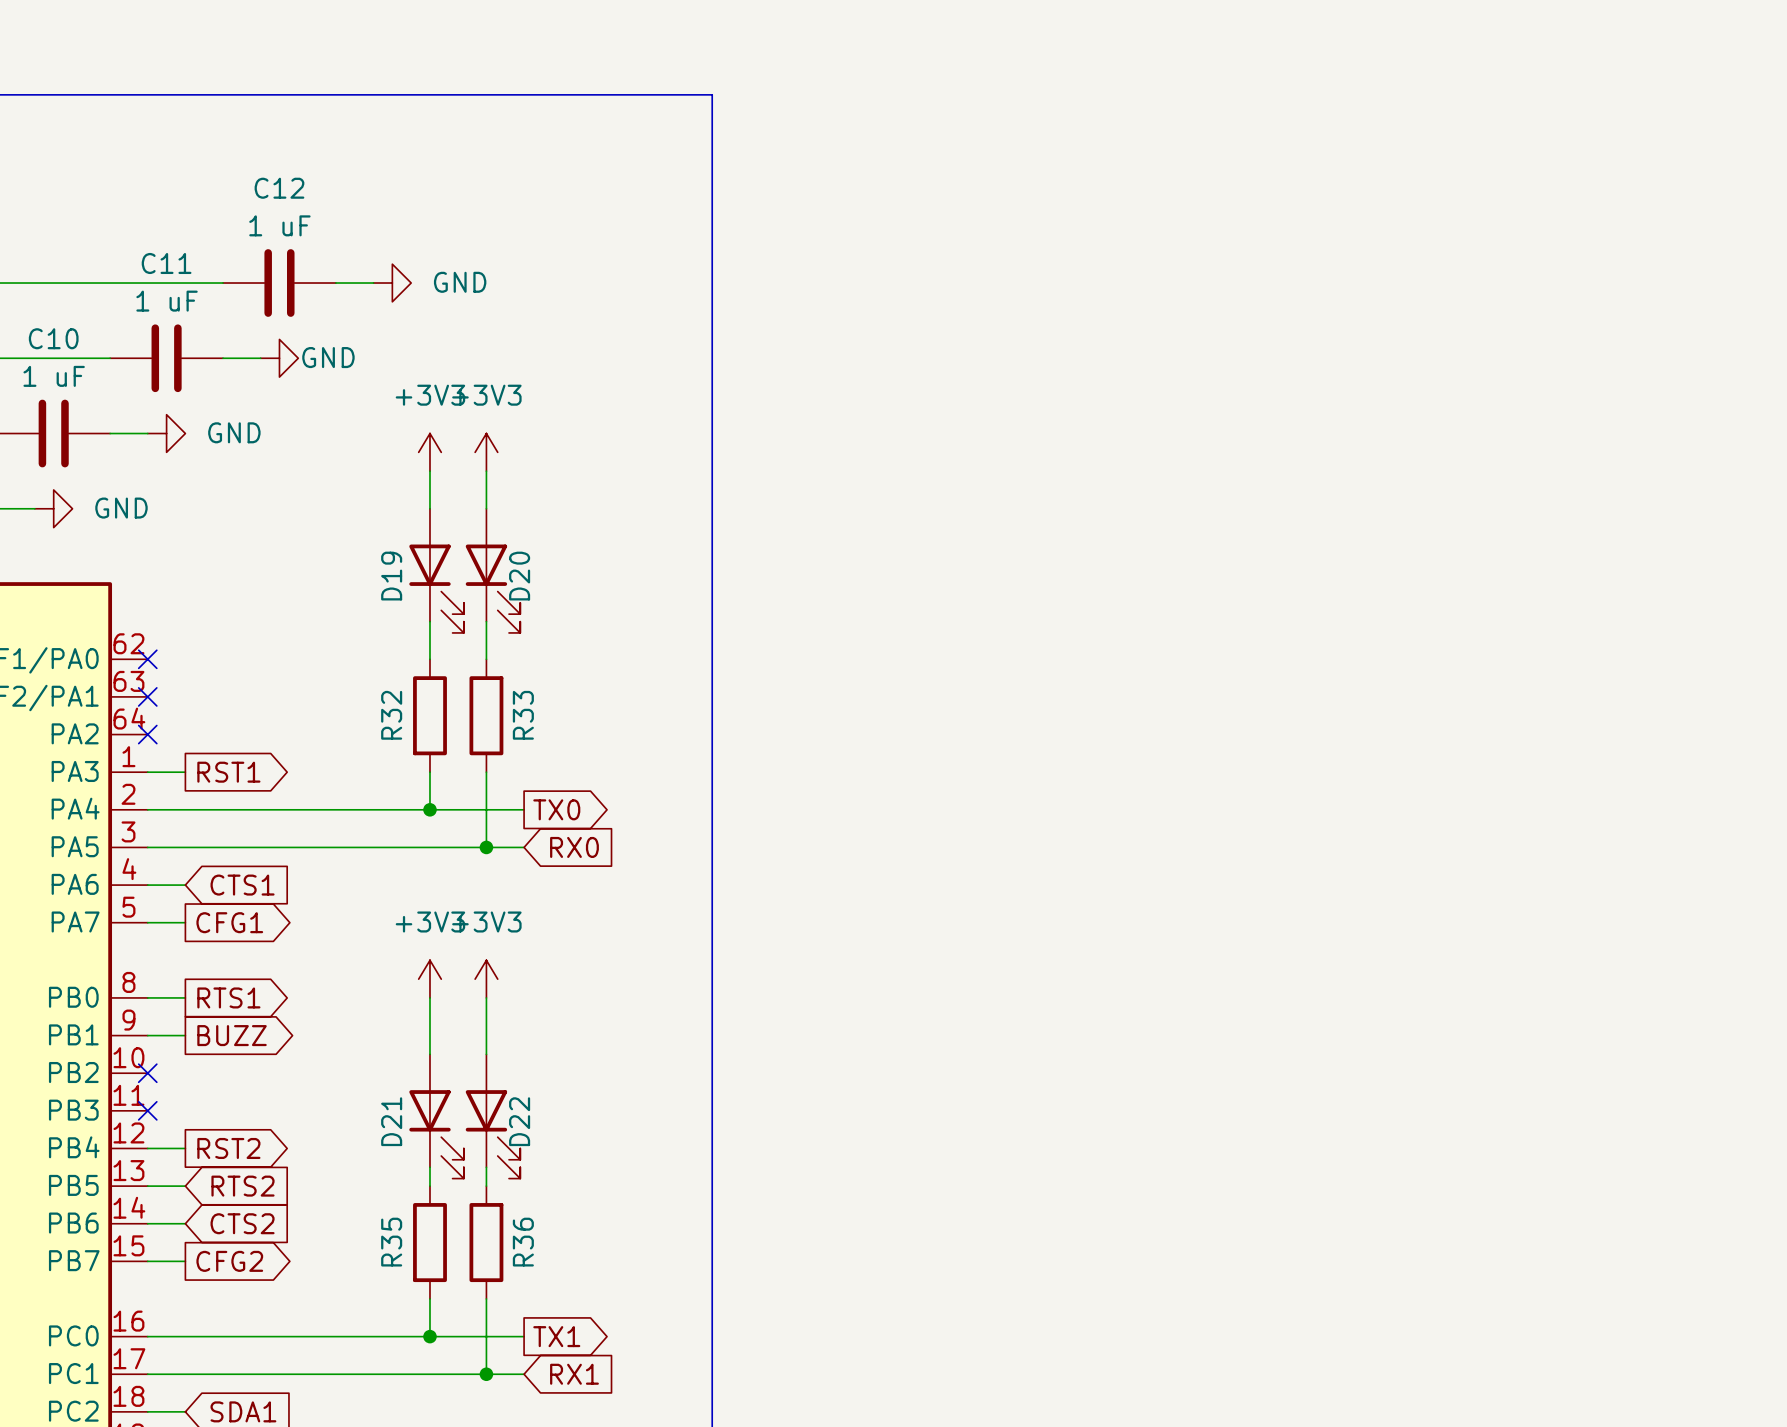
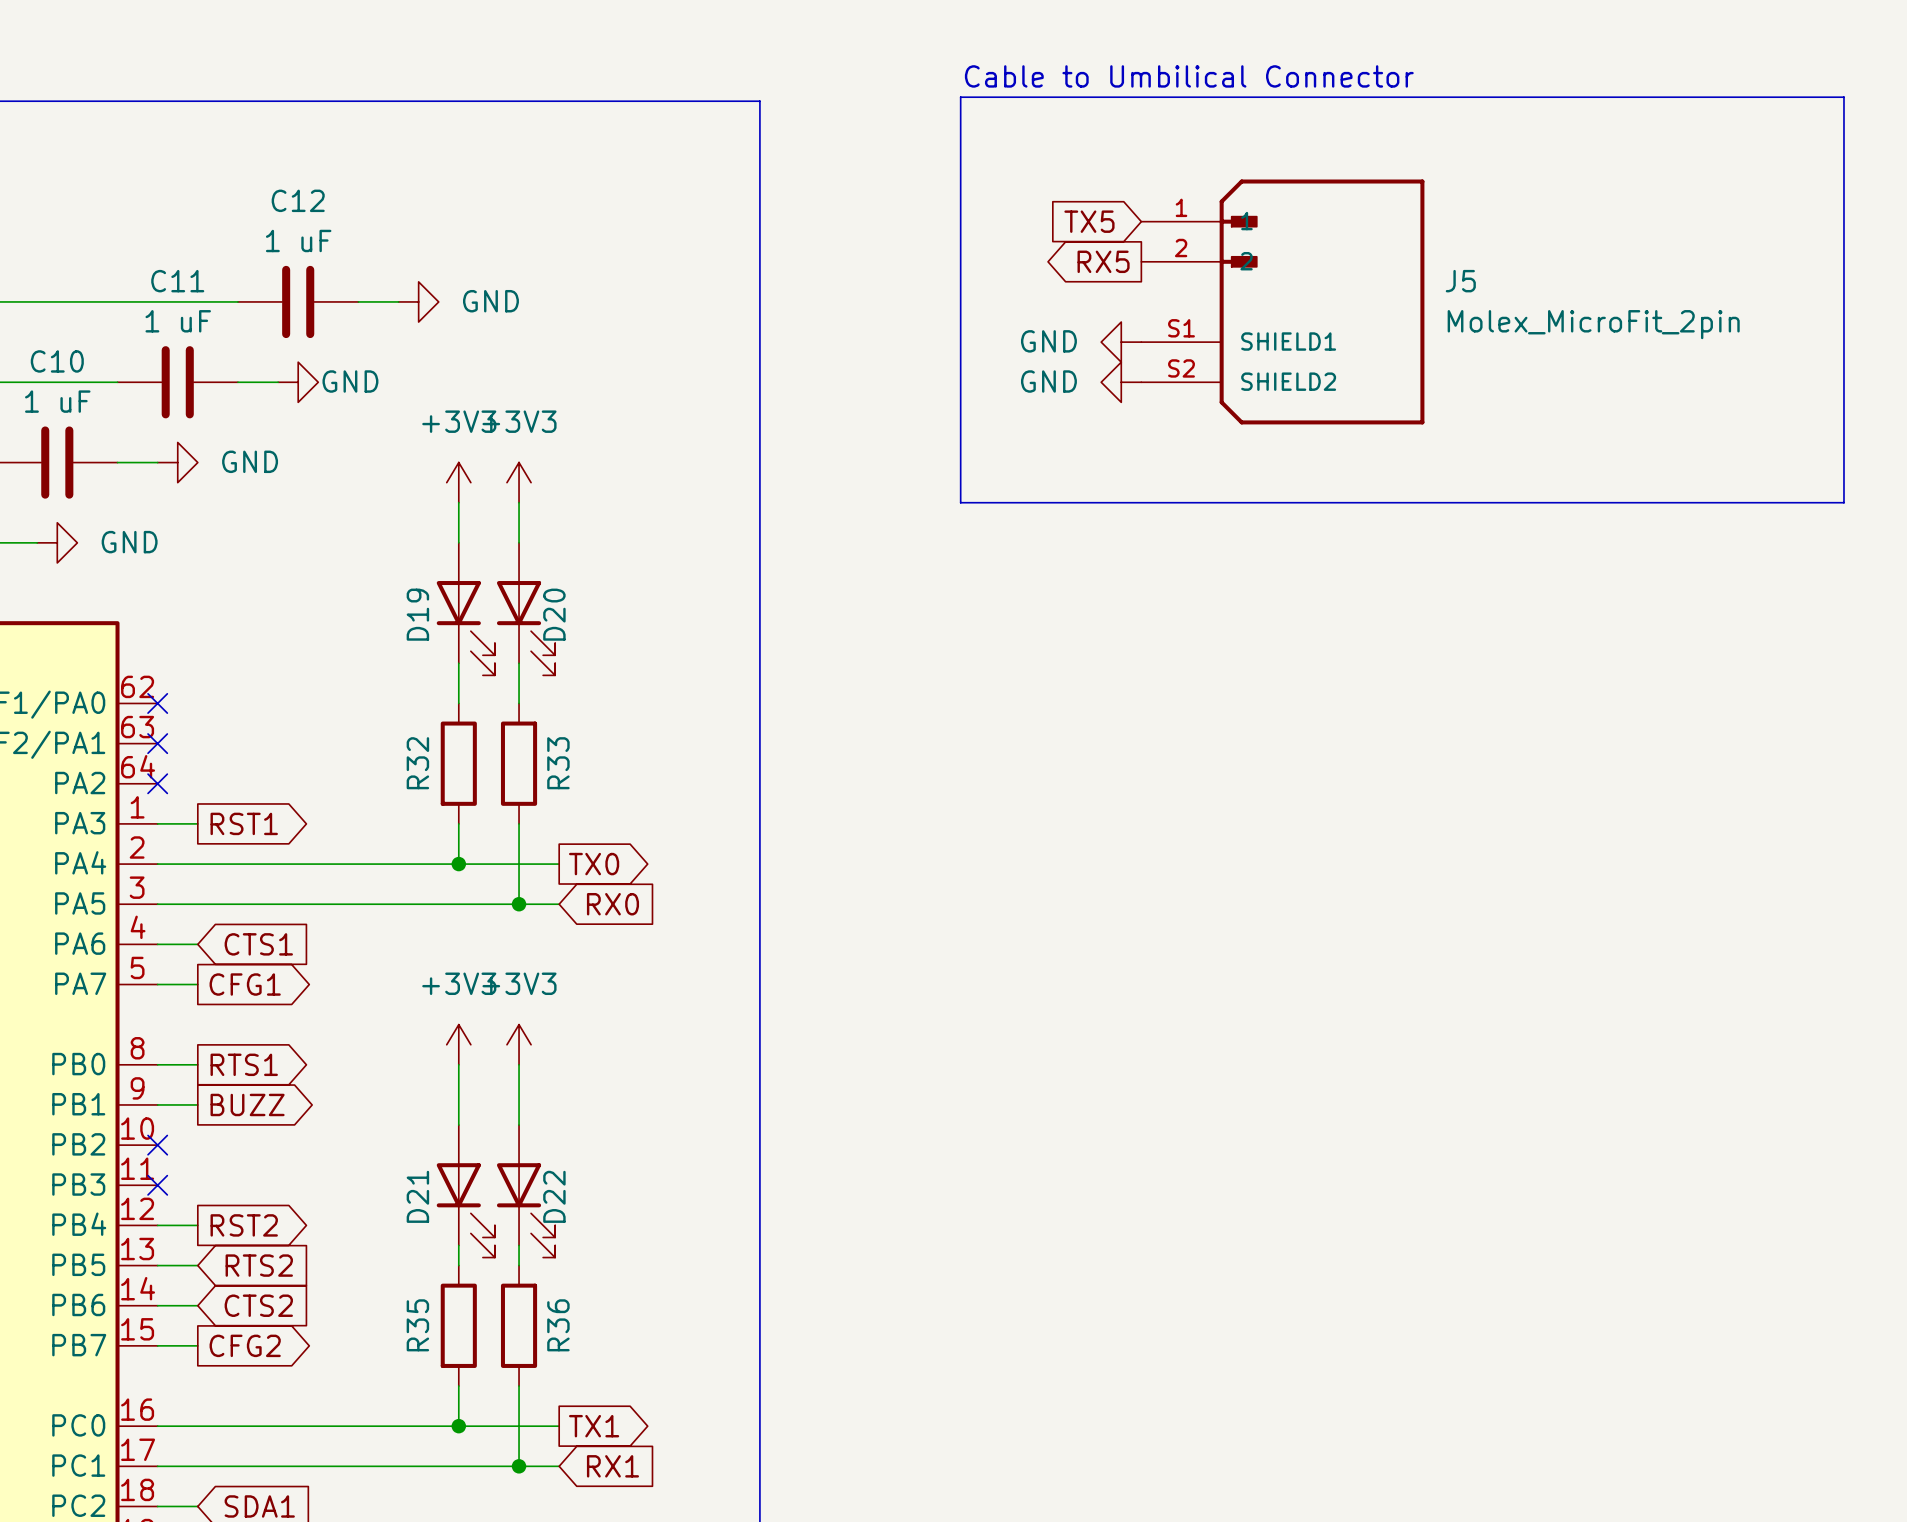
text: none -> Cable to Umbilical Connector (1189, 76)
line: none -> (960, 97) (1843, 97) (1843, 502) (960, 502) (960, 97)
global label: none -> TX5 (1089, 221)
global label: none -> RX5 (1103, 261)
J5: none -> Molex_MicroFit_2pin (1282, 301)
power symbol: none -> GND (1121, 342)
power symbol: none -> GND (1121, 382)

